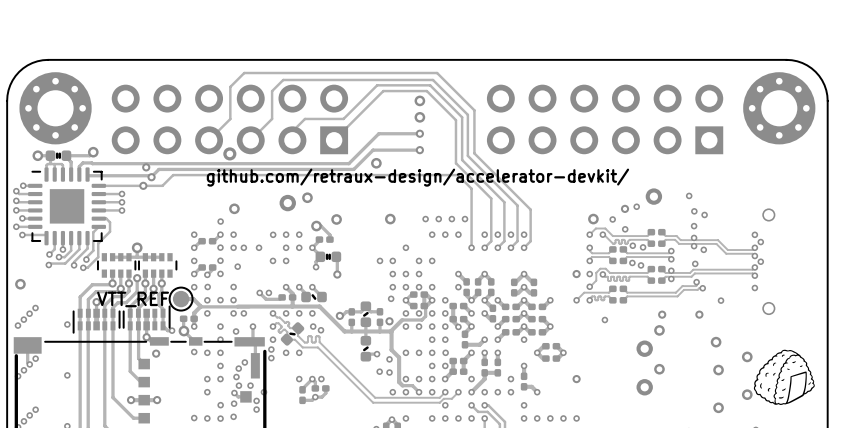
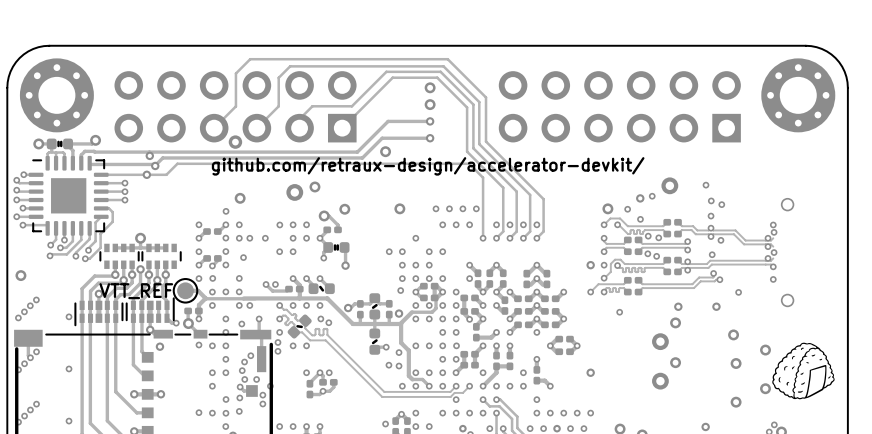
via: none -> (774, 232)
via: (760, 242) -> none
via: none -> (768, 238)
via: (754, 247) -> none
via: none -> (768, 246)
via: (754, 255) -> none
via: none -> (774, 252)
via: (760, 261) -> none
via: none -> (768, 258)
via: (754, 267) -> none

